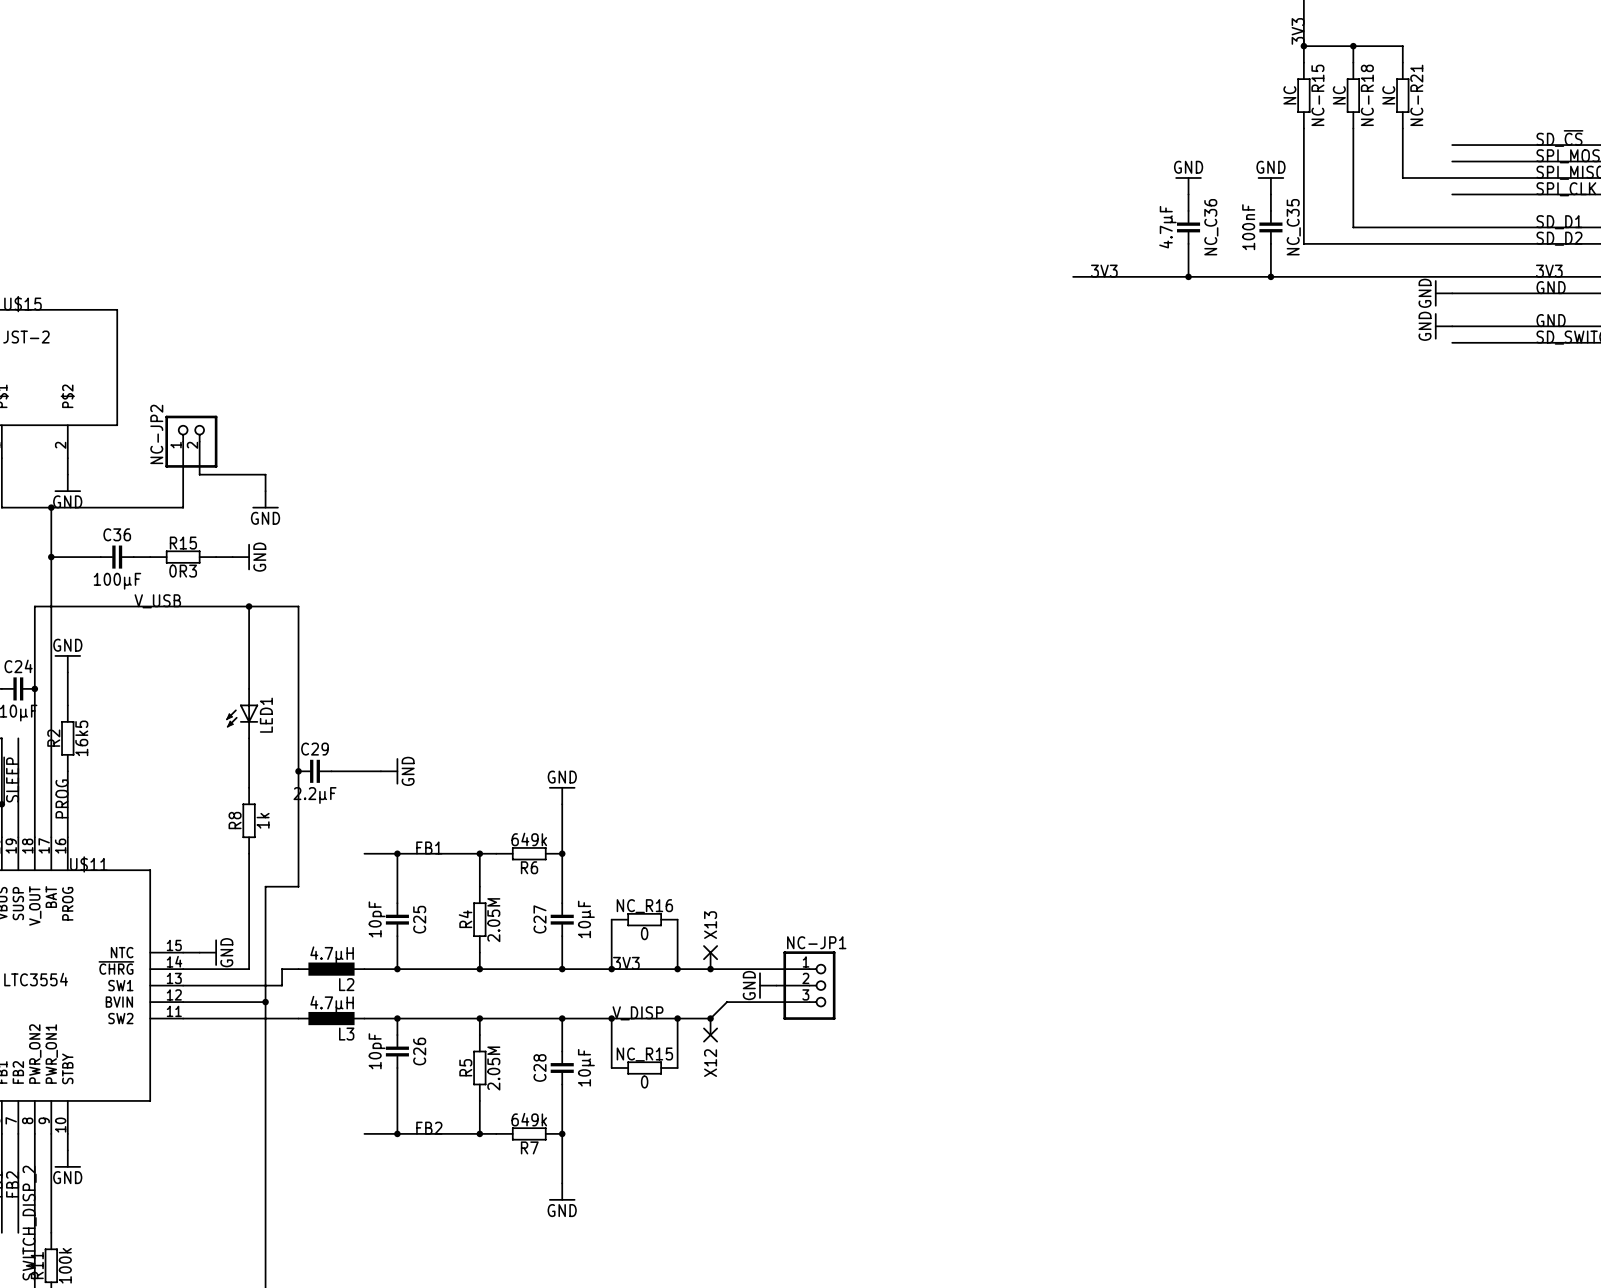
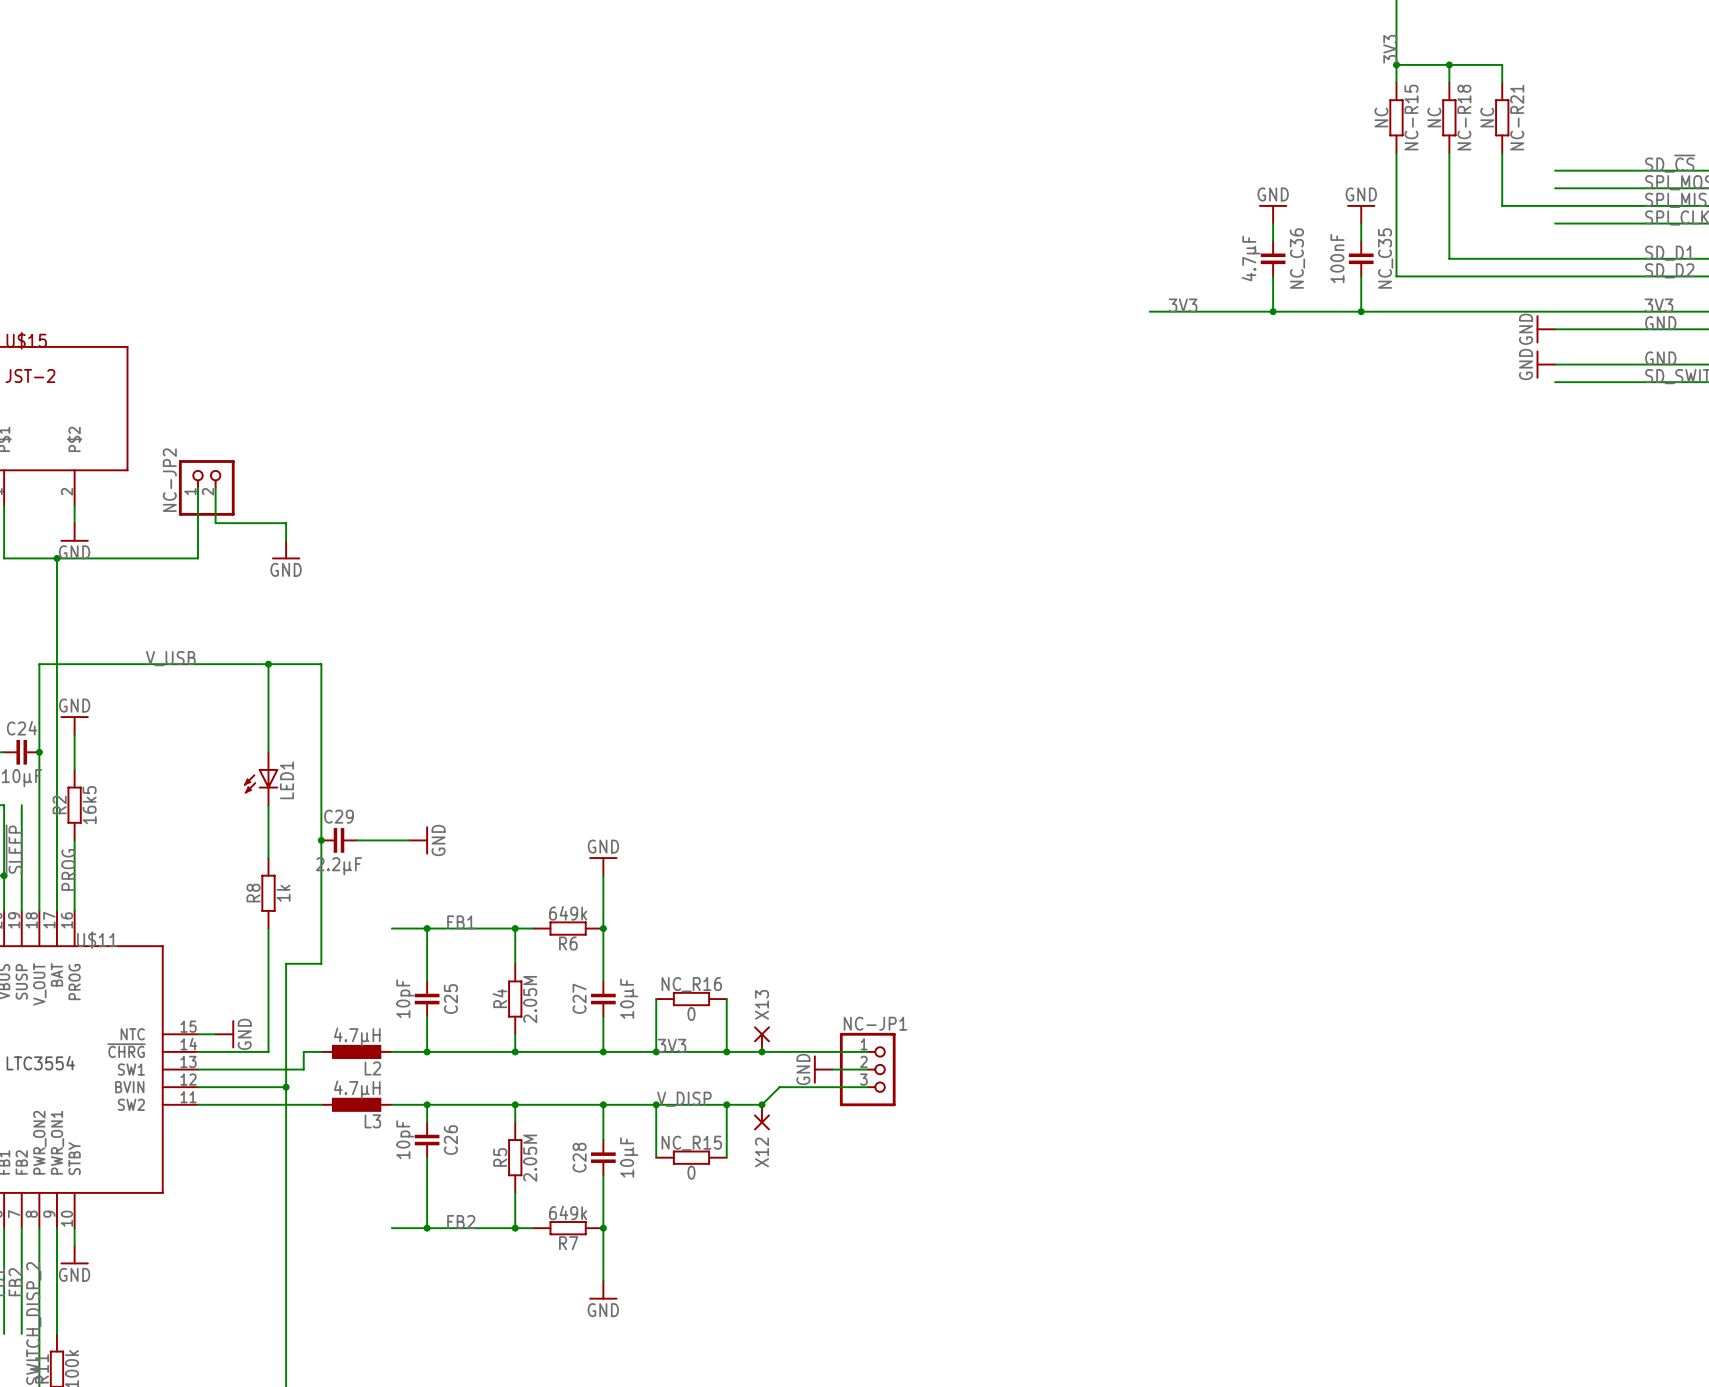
wire: (51, 557) (100, 557) -> none
junction: (51, 557) -> none
C36: 100µF (117, 557) -> none
wire: (133, 557) (150, 557) -> none
R15: 0R3 (183, 557) -> none
wire: (216, 557) (232, 557) -> none
power symbol: GND (241, 557) -> none

